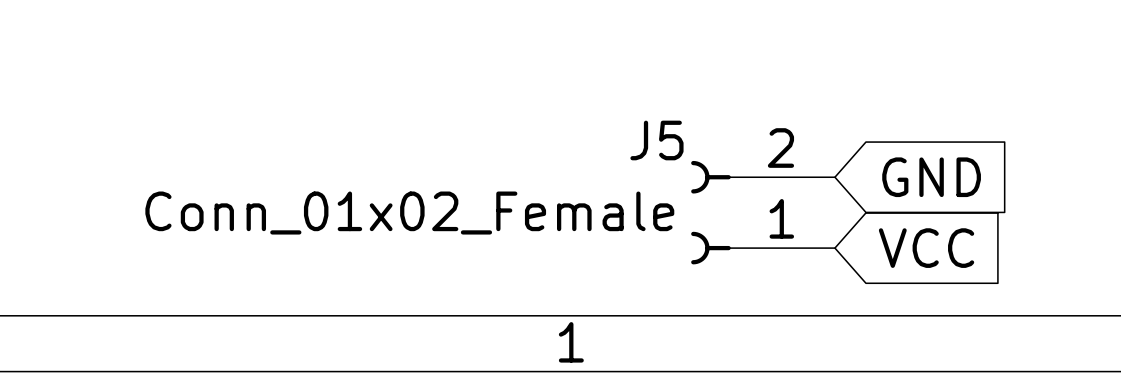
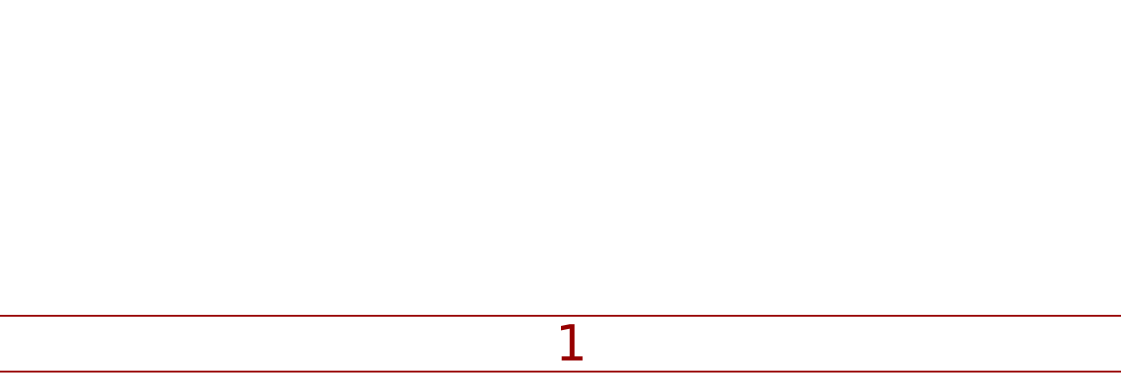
global label: GND (931, 177) -> none
J5: Conn_01x02_Female (763, 212) -> none
global label: VCC (926, 248) -> none

